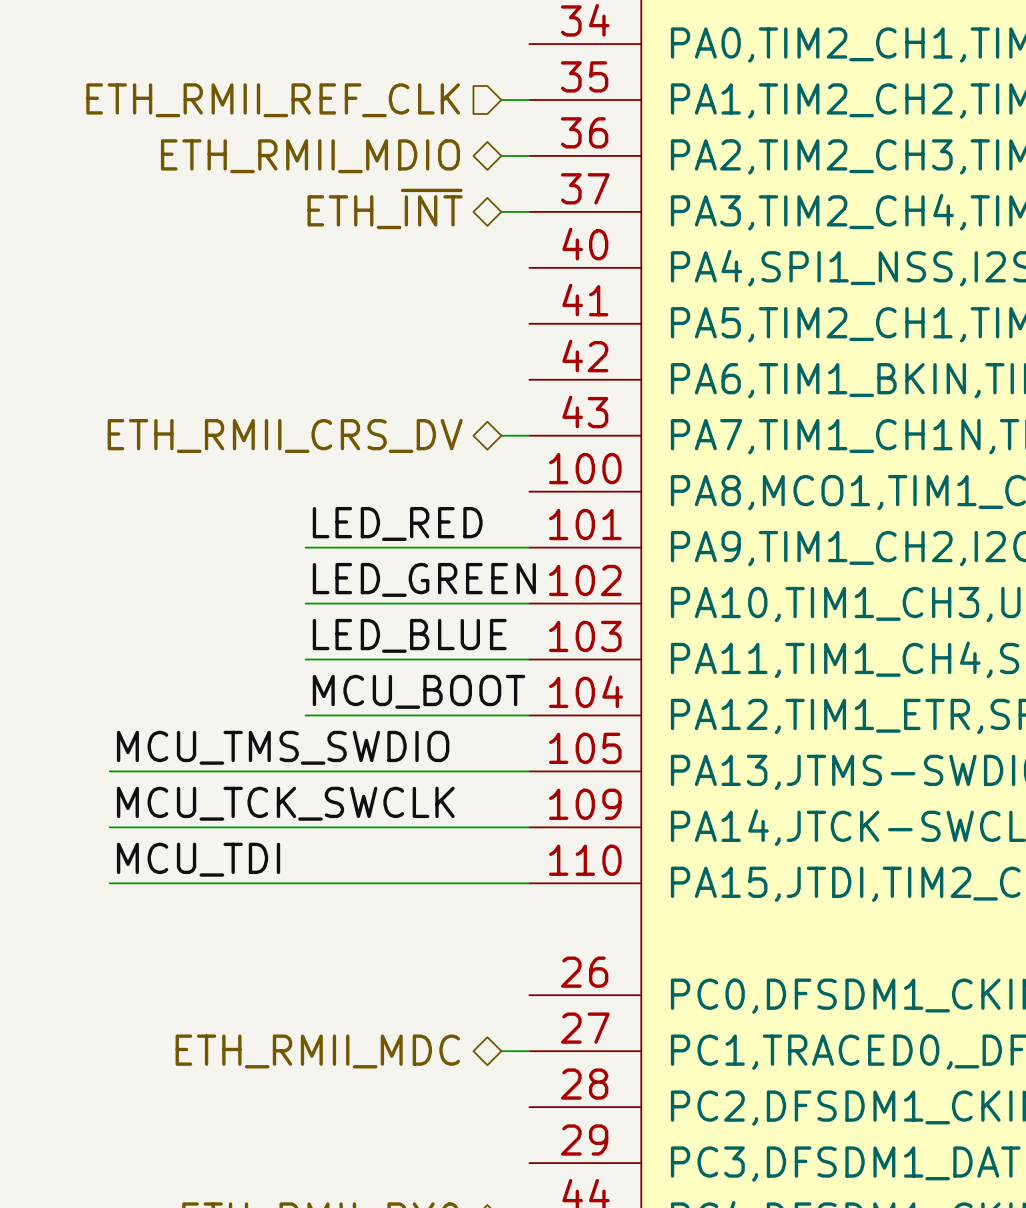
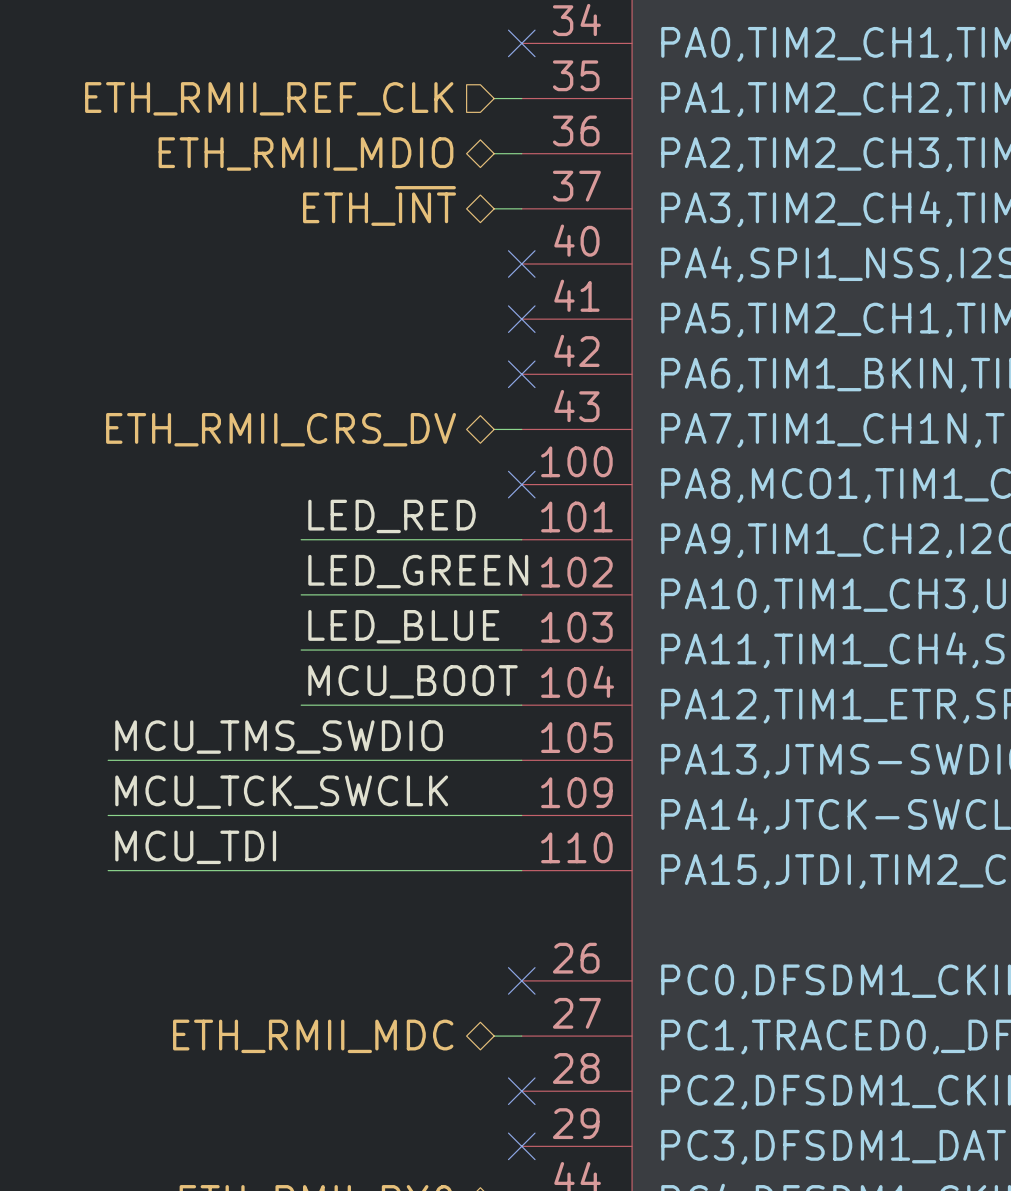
no-connect mark: none -> (521, 43)
no-connect mark: none -> (521, 264)
no-connect mark: none -> (521, 319)
no-connect mark: none -> (521, 374)
no-connect mark: none -> (521, 484)
no-connect mark: none -> (521, 980)
no-connect mark: none -> (521, 1091)
no-connect mark: none -> (521, 1146)

